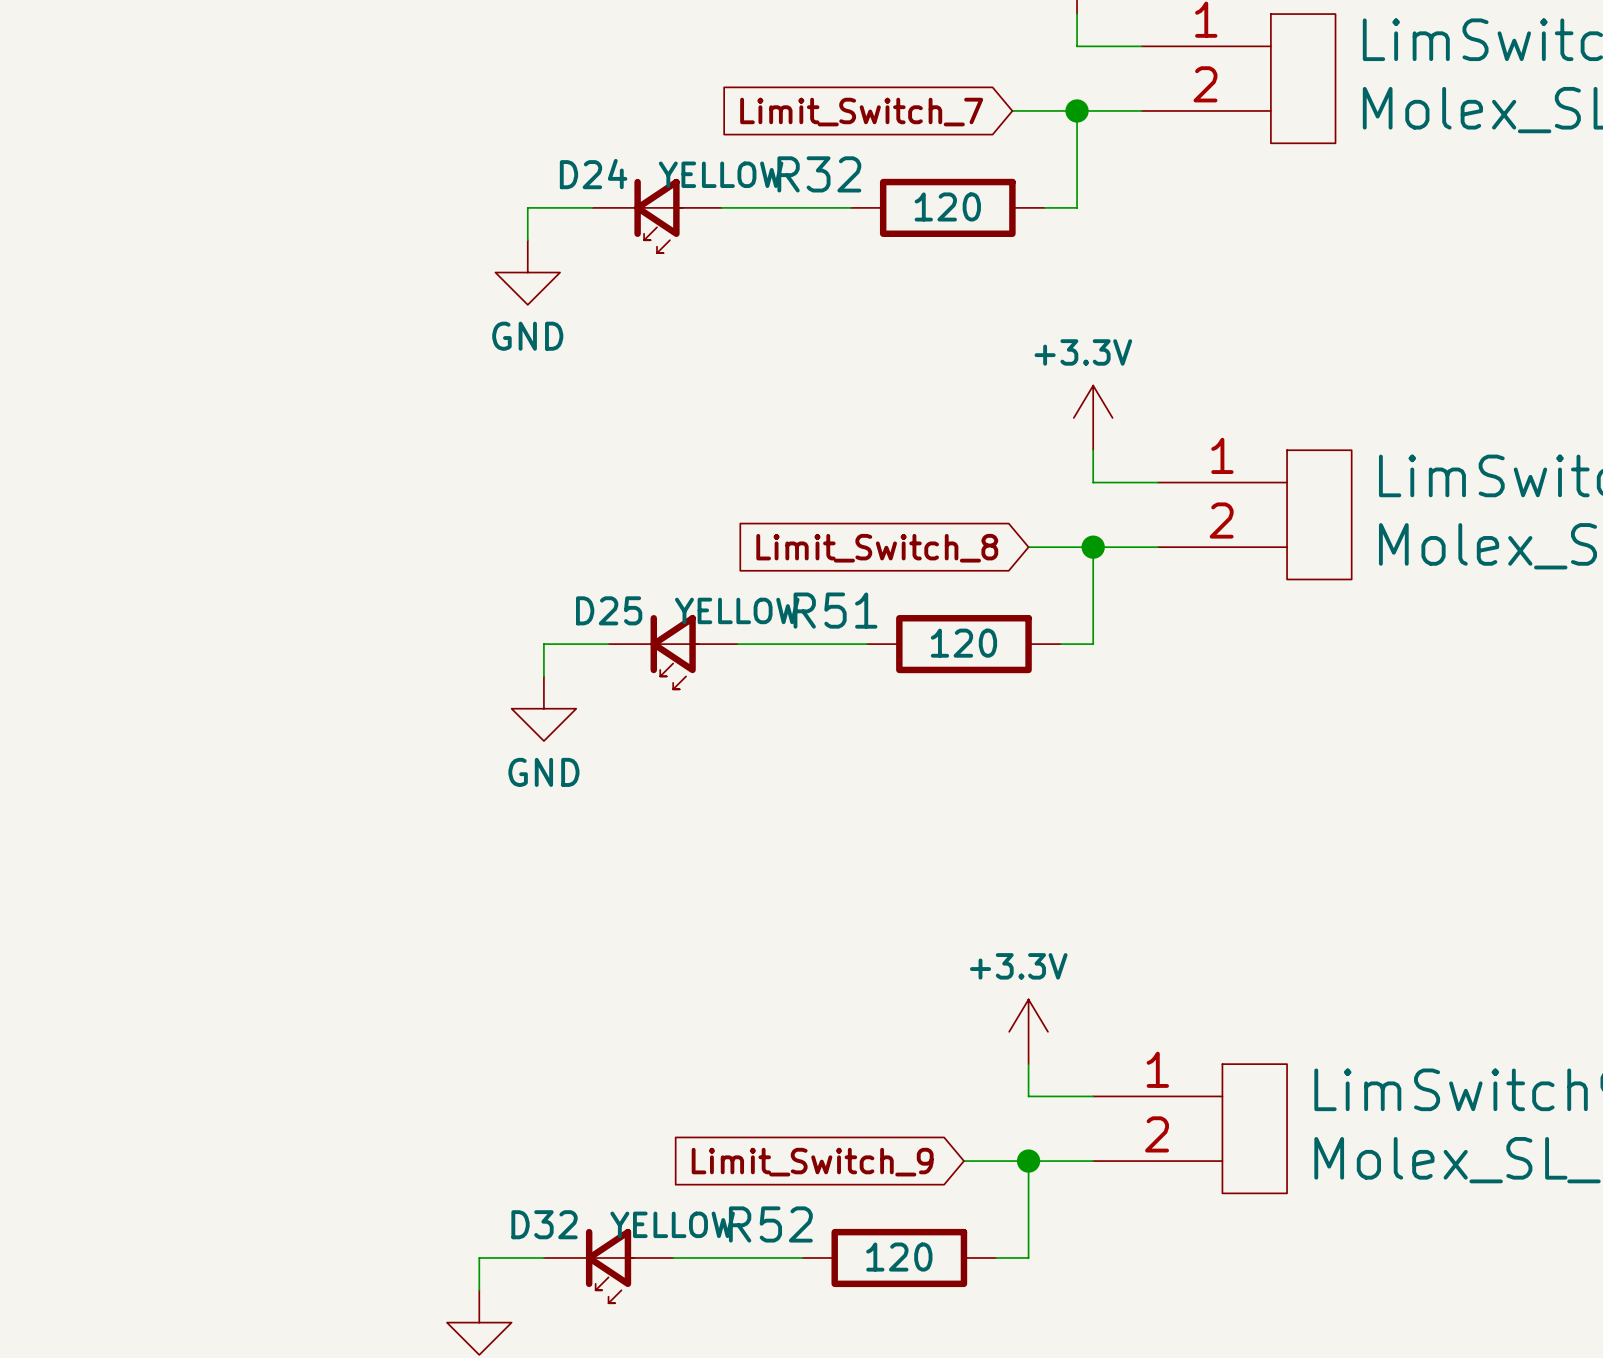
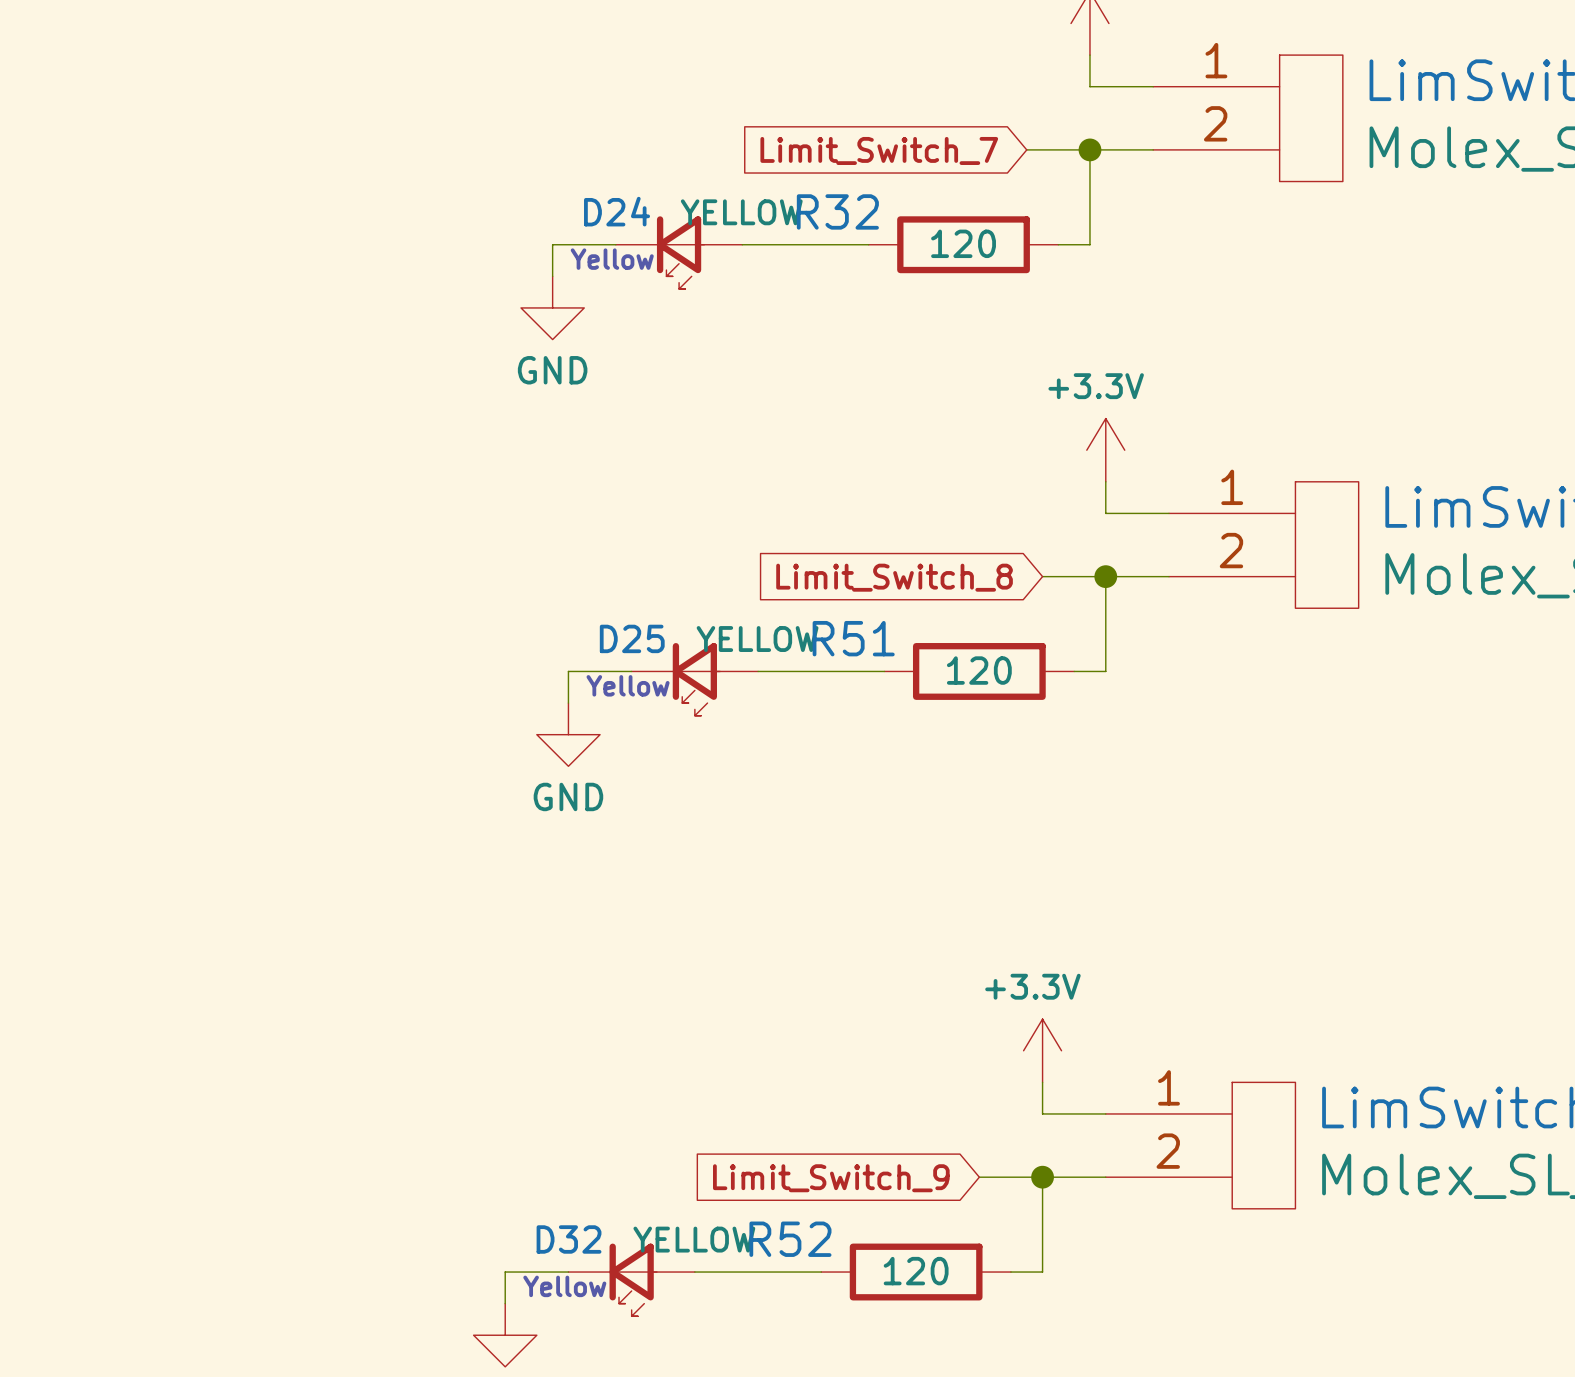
text: none -> Yellow (612, 259)
text: none -> Yellow (628, 685)
text: none -> Yellow (564, 1286)

